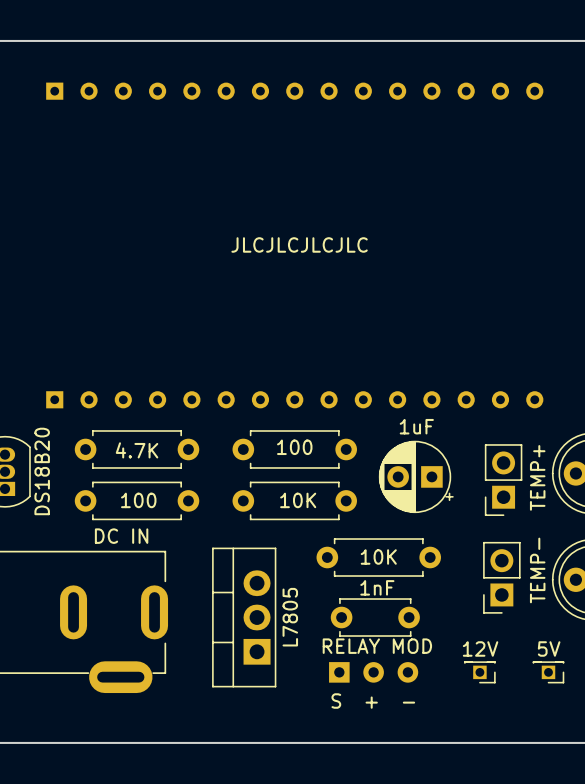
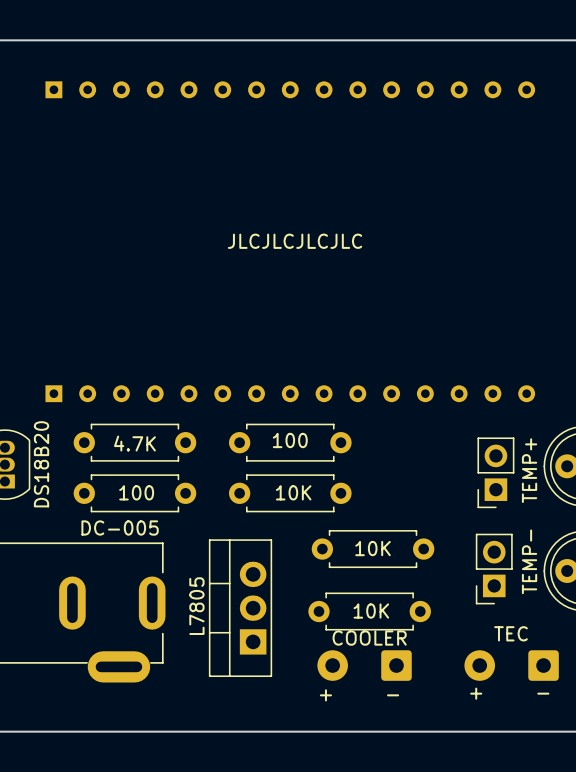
part: 1uF (416, 476) -> none
part value: DC IN (121, 536) -> DC-005 (120, 527)
part value: 1nF (377, 587) -> 10K (371, 611)
part footprint: [330, 598, 420, 637] -> [308, 592, 431, 631]
part value position: L7805 (290, 617) -> L7805 (196, 606)
part value: RELAY MOD (377, 646) -> COOLER (369, 638)
part footprint: [329, 662, 419, 683] -> [317, 650, 412, 681]
part: 12V (479, 672) -> none
part: 5V (548, 672) -> none
part: none -> TEC (511, 665)
text: S + - (373, 701) -> + - (359, 695)
text: none -> + - (509, 693)

